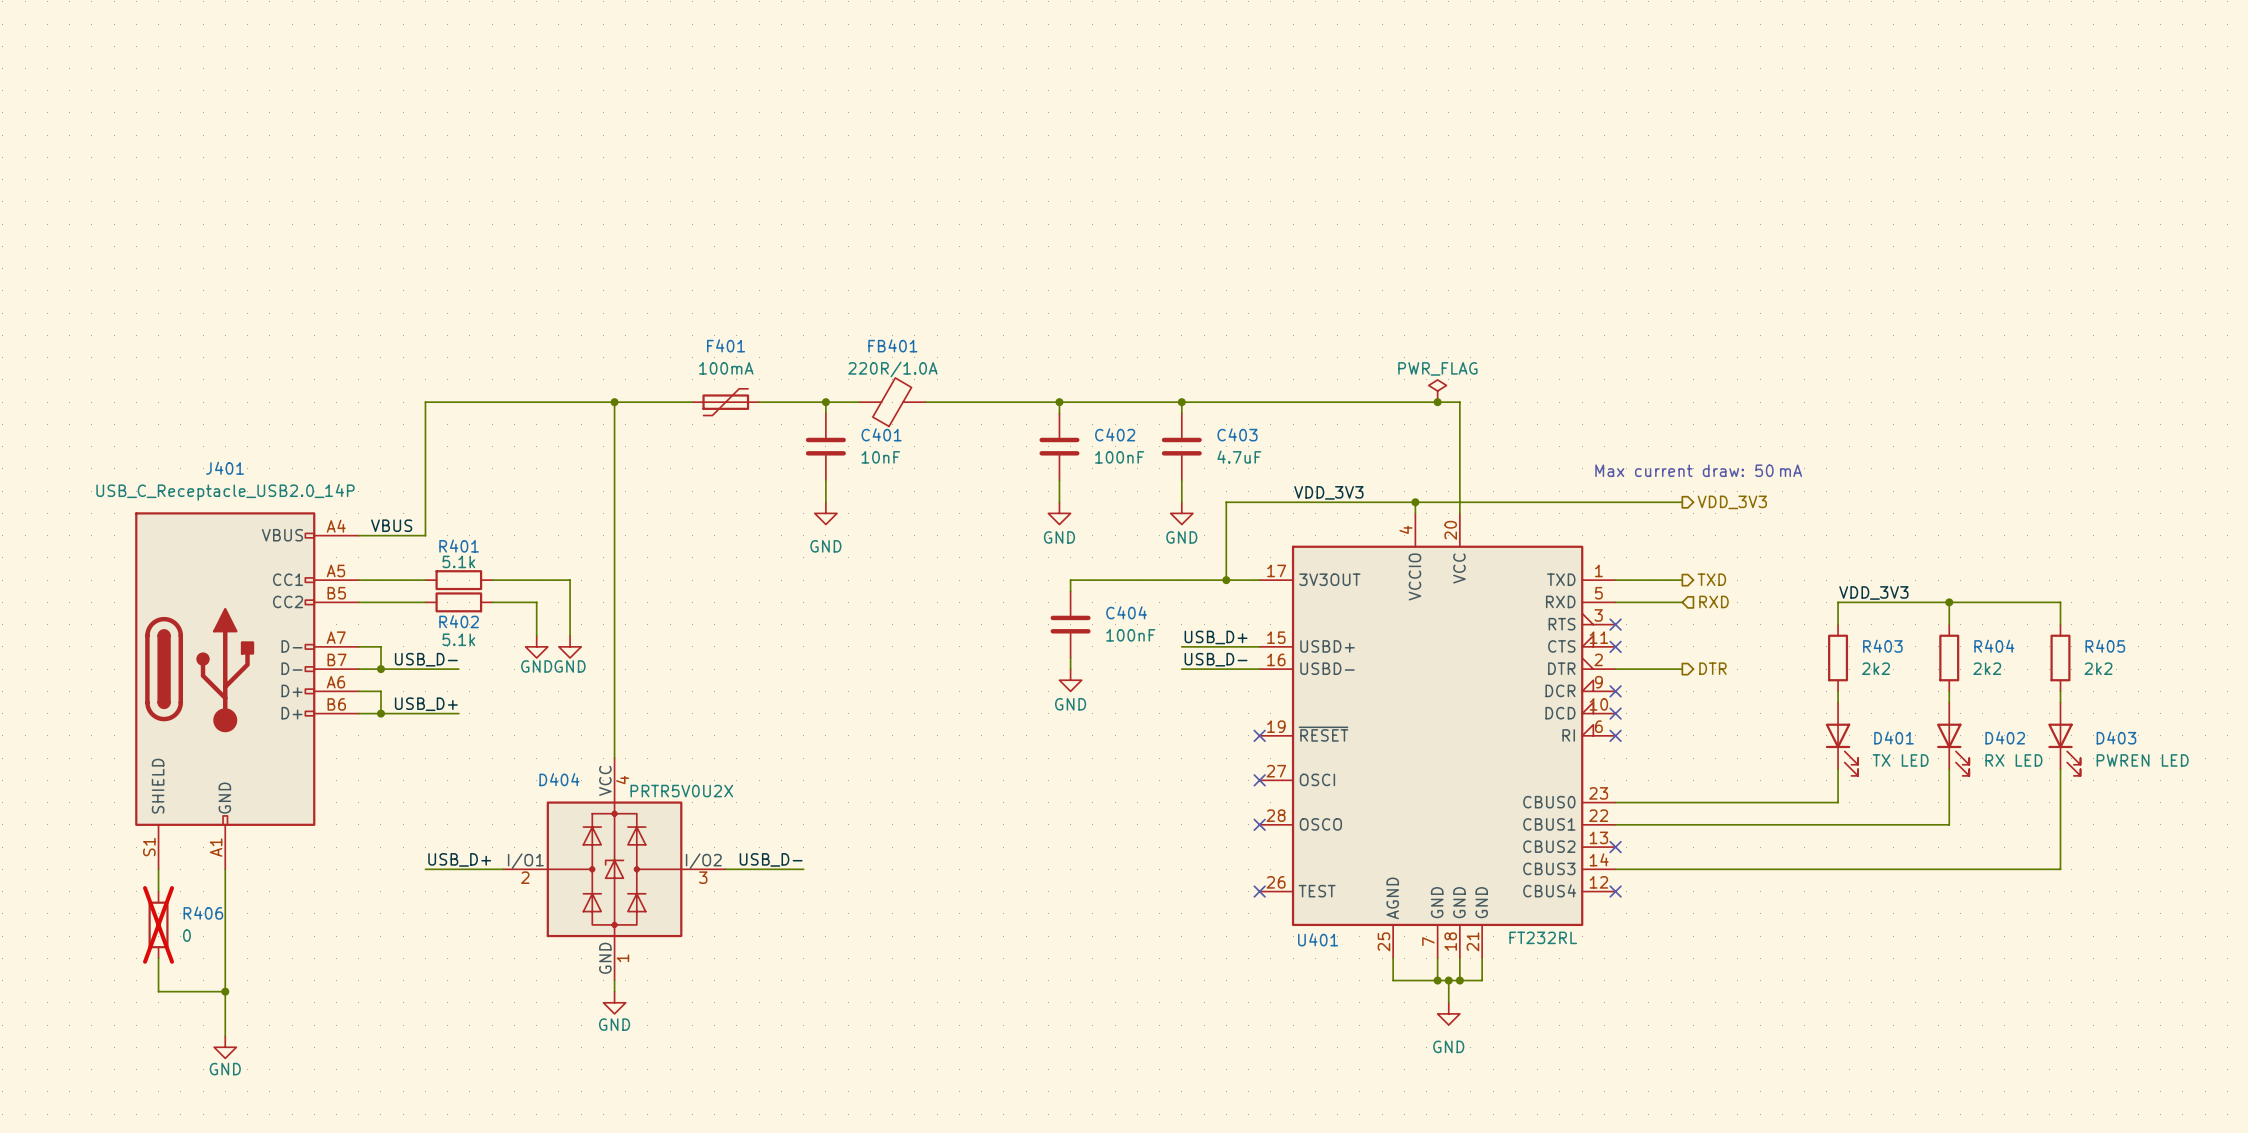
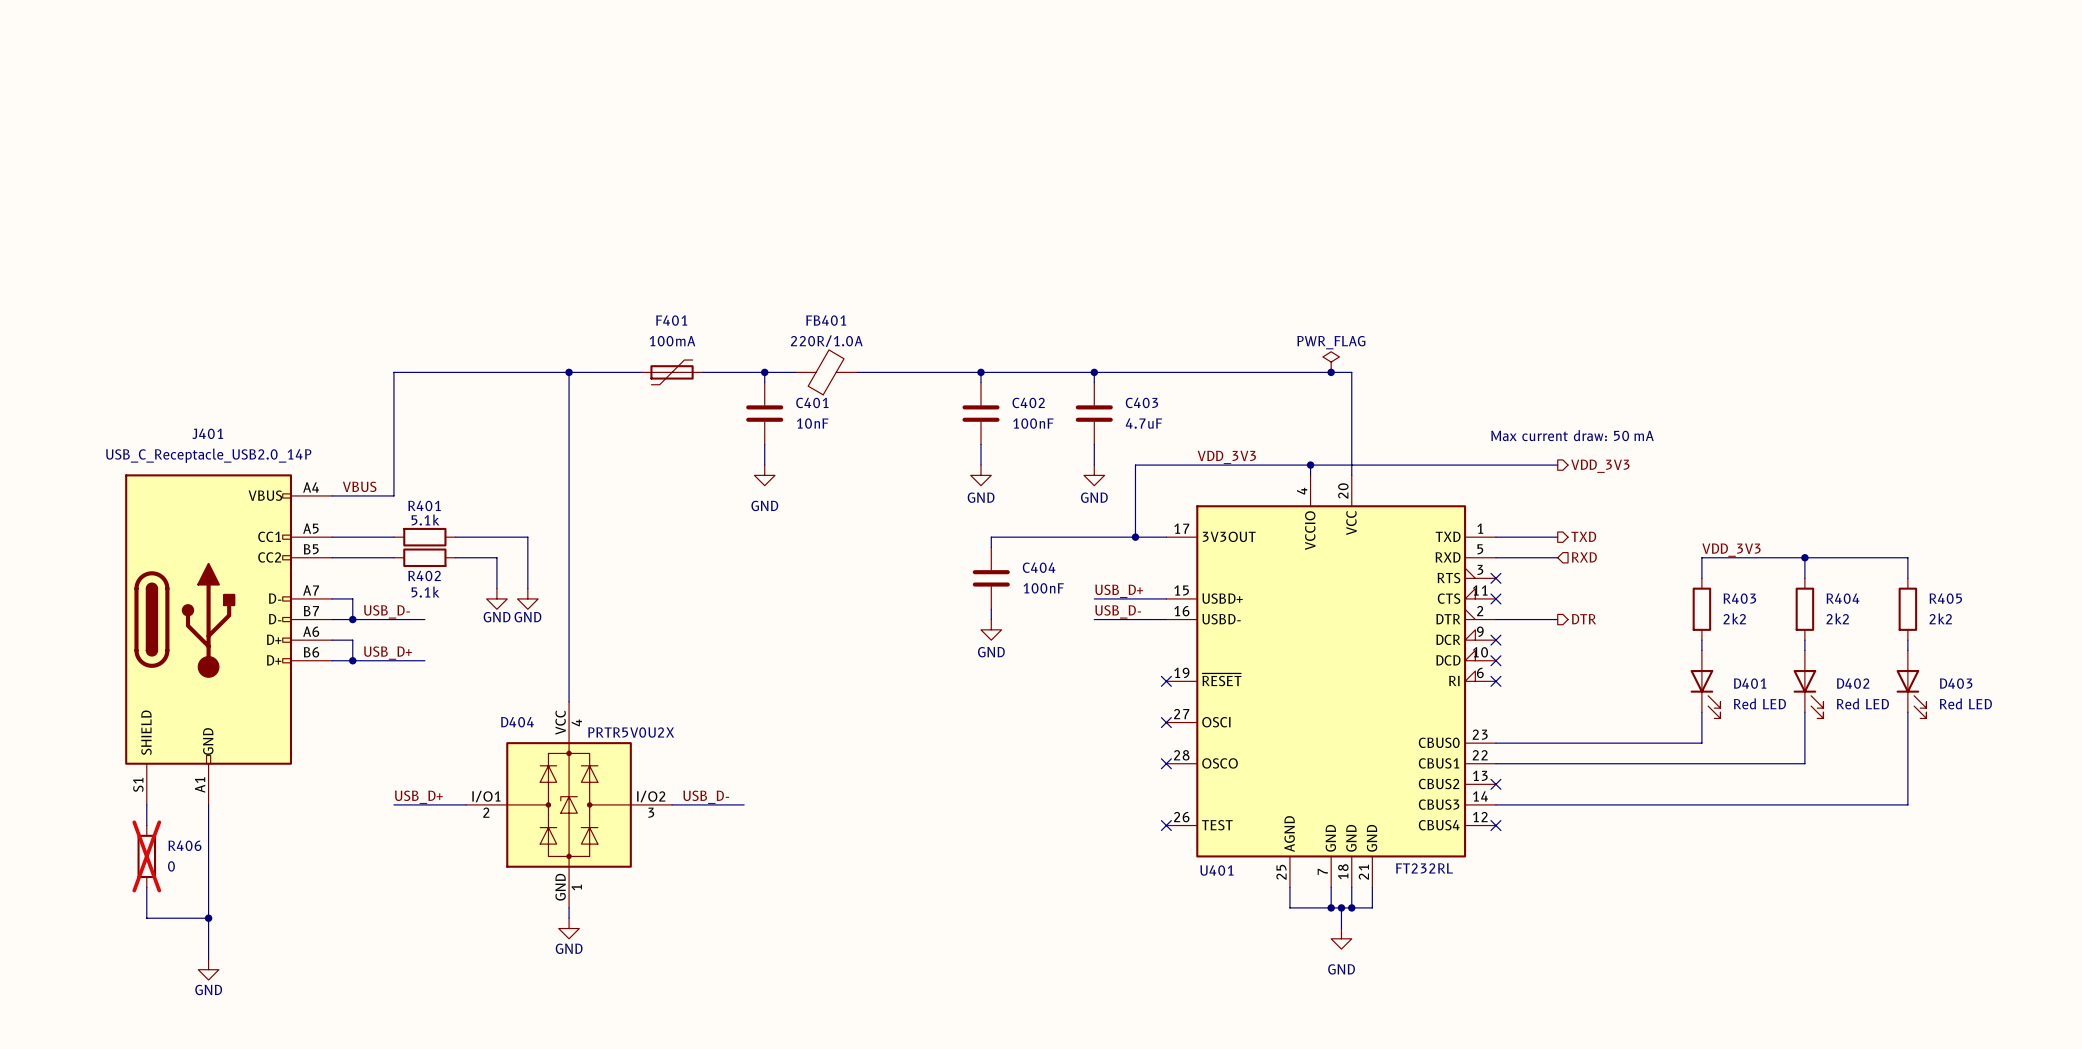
D401 value: TX LED (1900, 760) -> Red LED (1759, 703)
D402 value: RX LED (2013, 760) -> Red LED (1862, 703)
D403 value: PWREN LED (2142, 760) -> Red LED (1965, 703)

